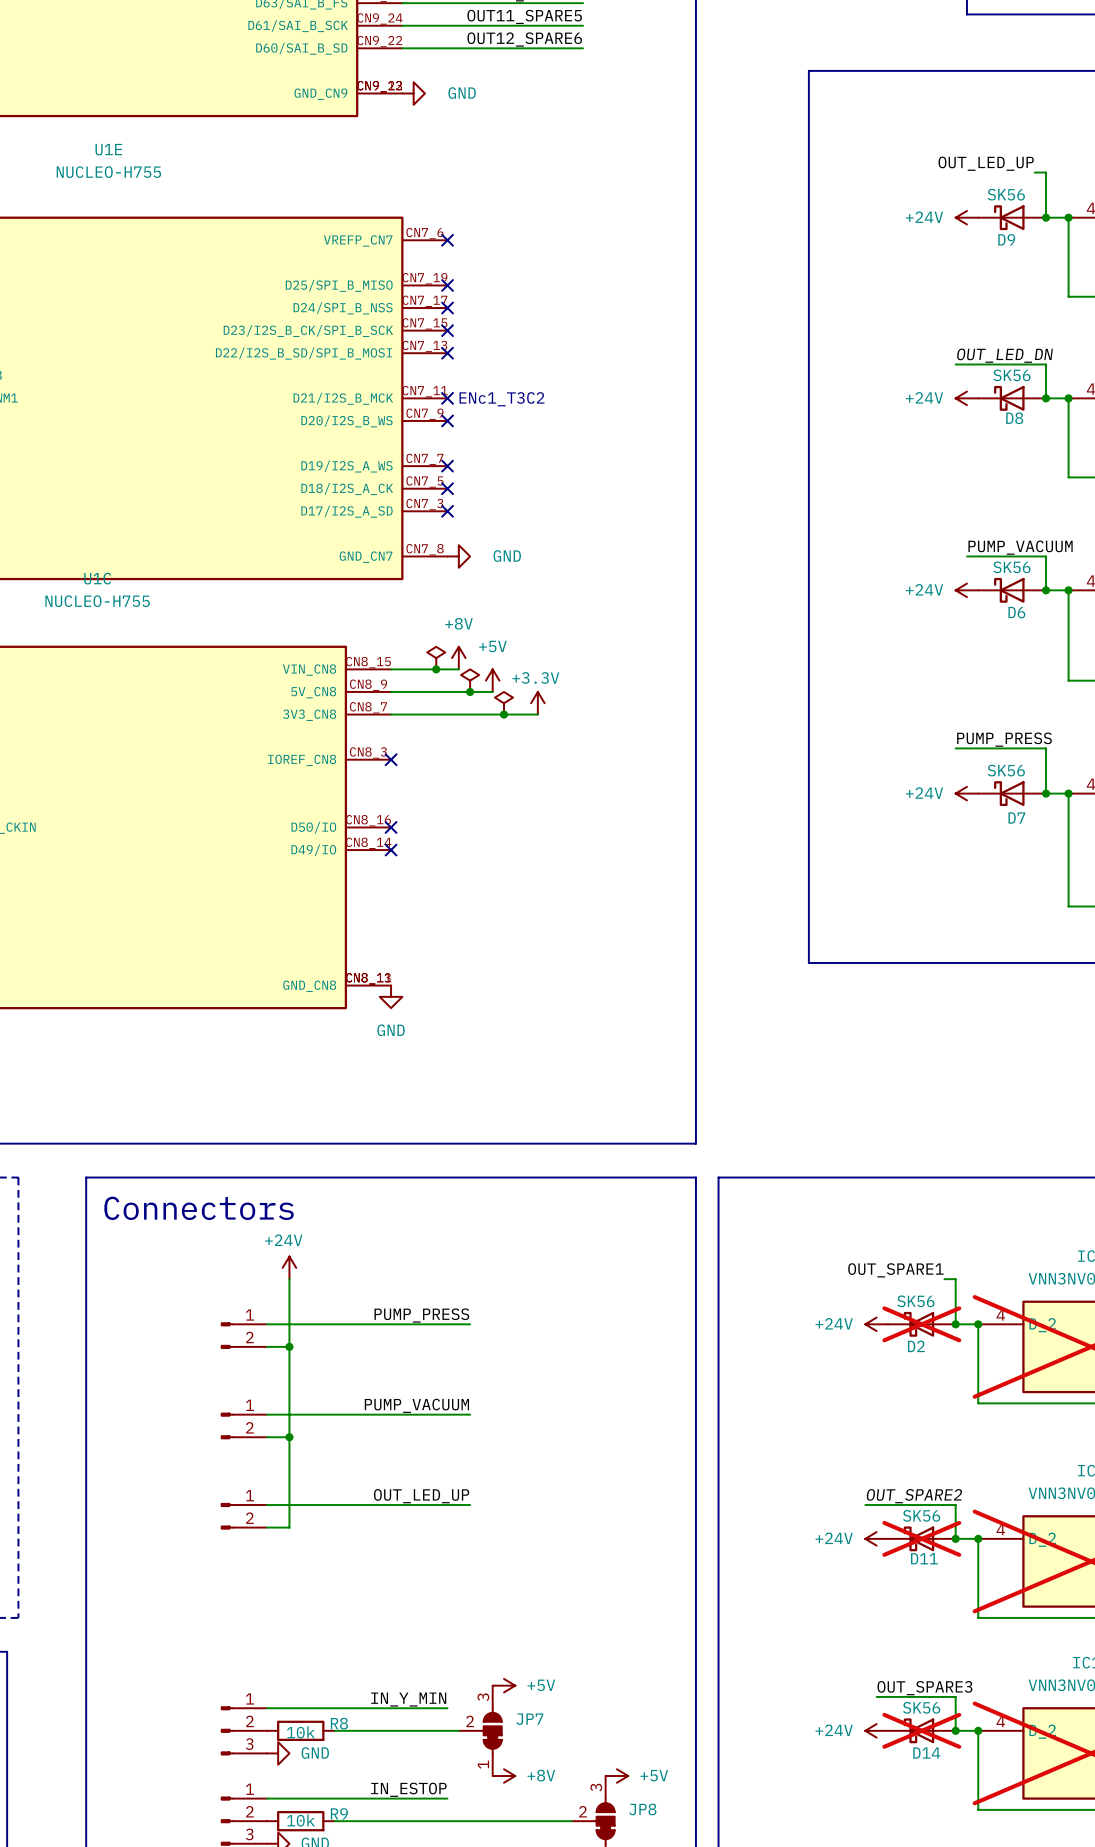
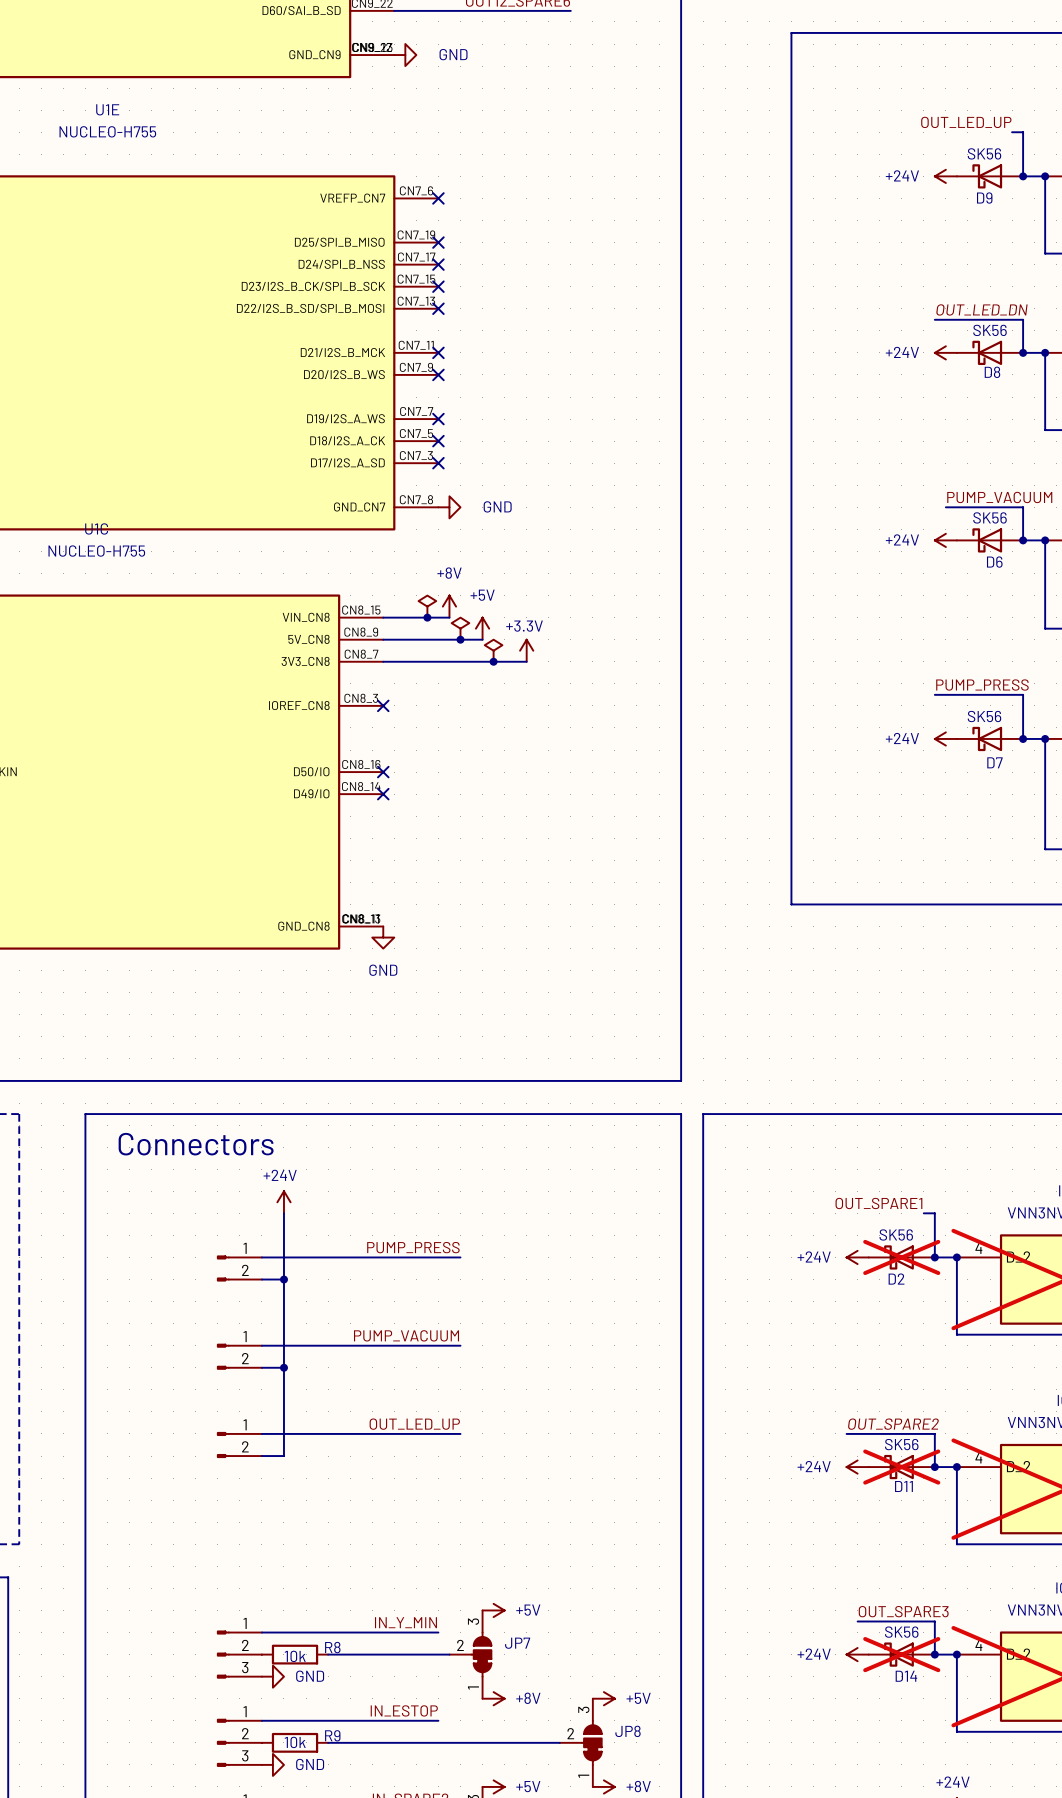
text: ENc1_T3C2 (501, 399) -> none

